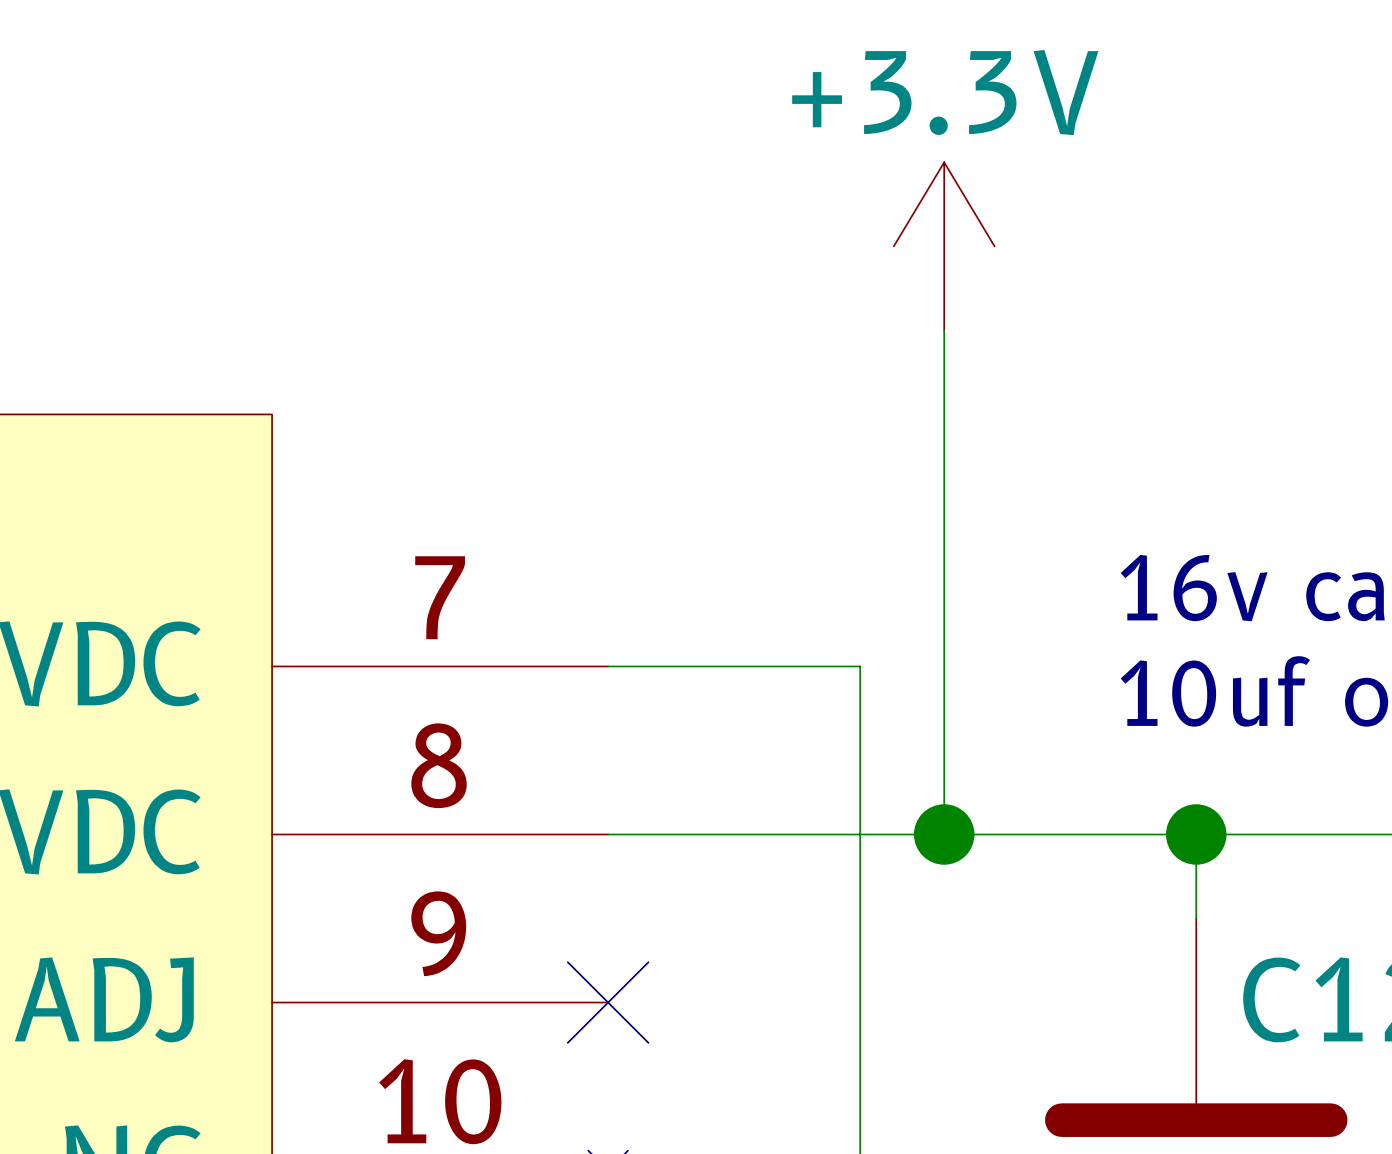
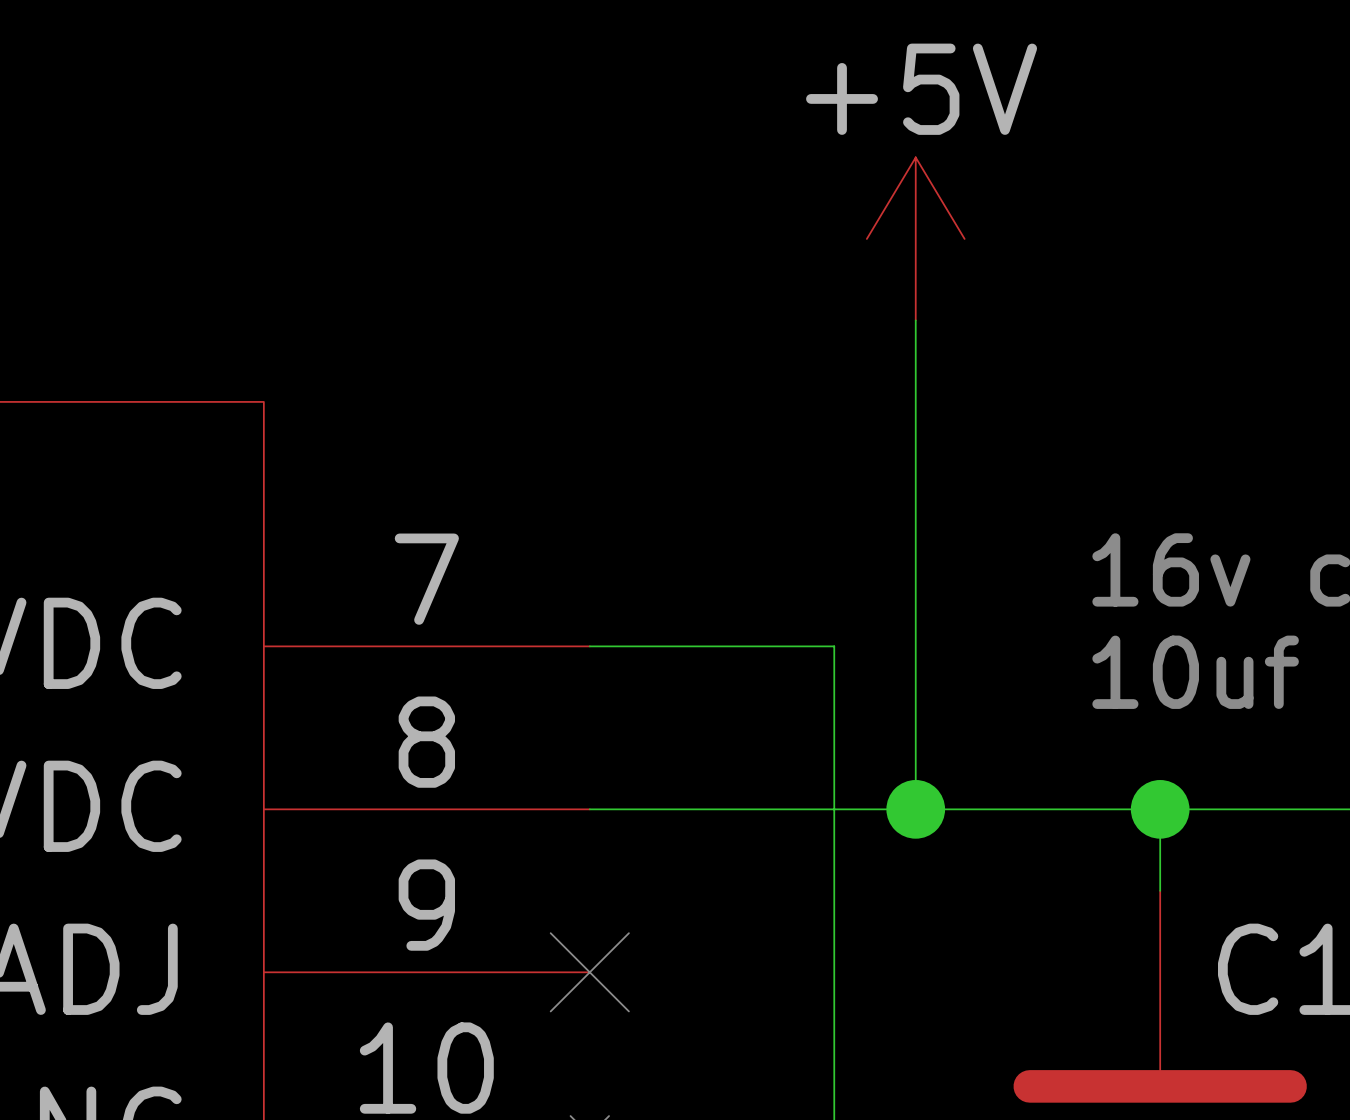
power symbol: +3.3V (944, 246) -> +5V (915, 238)

